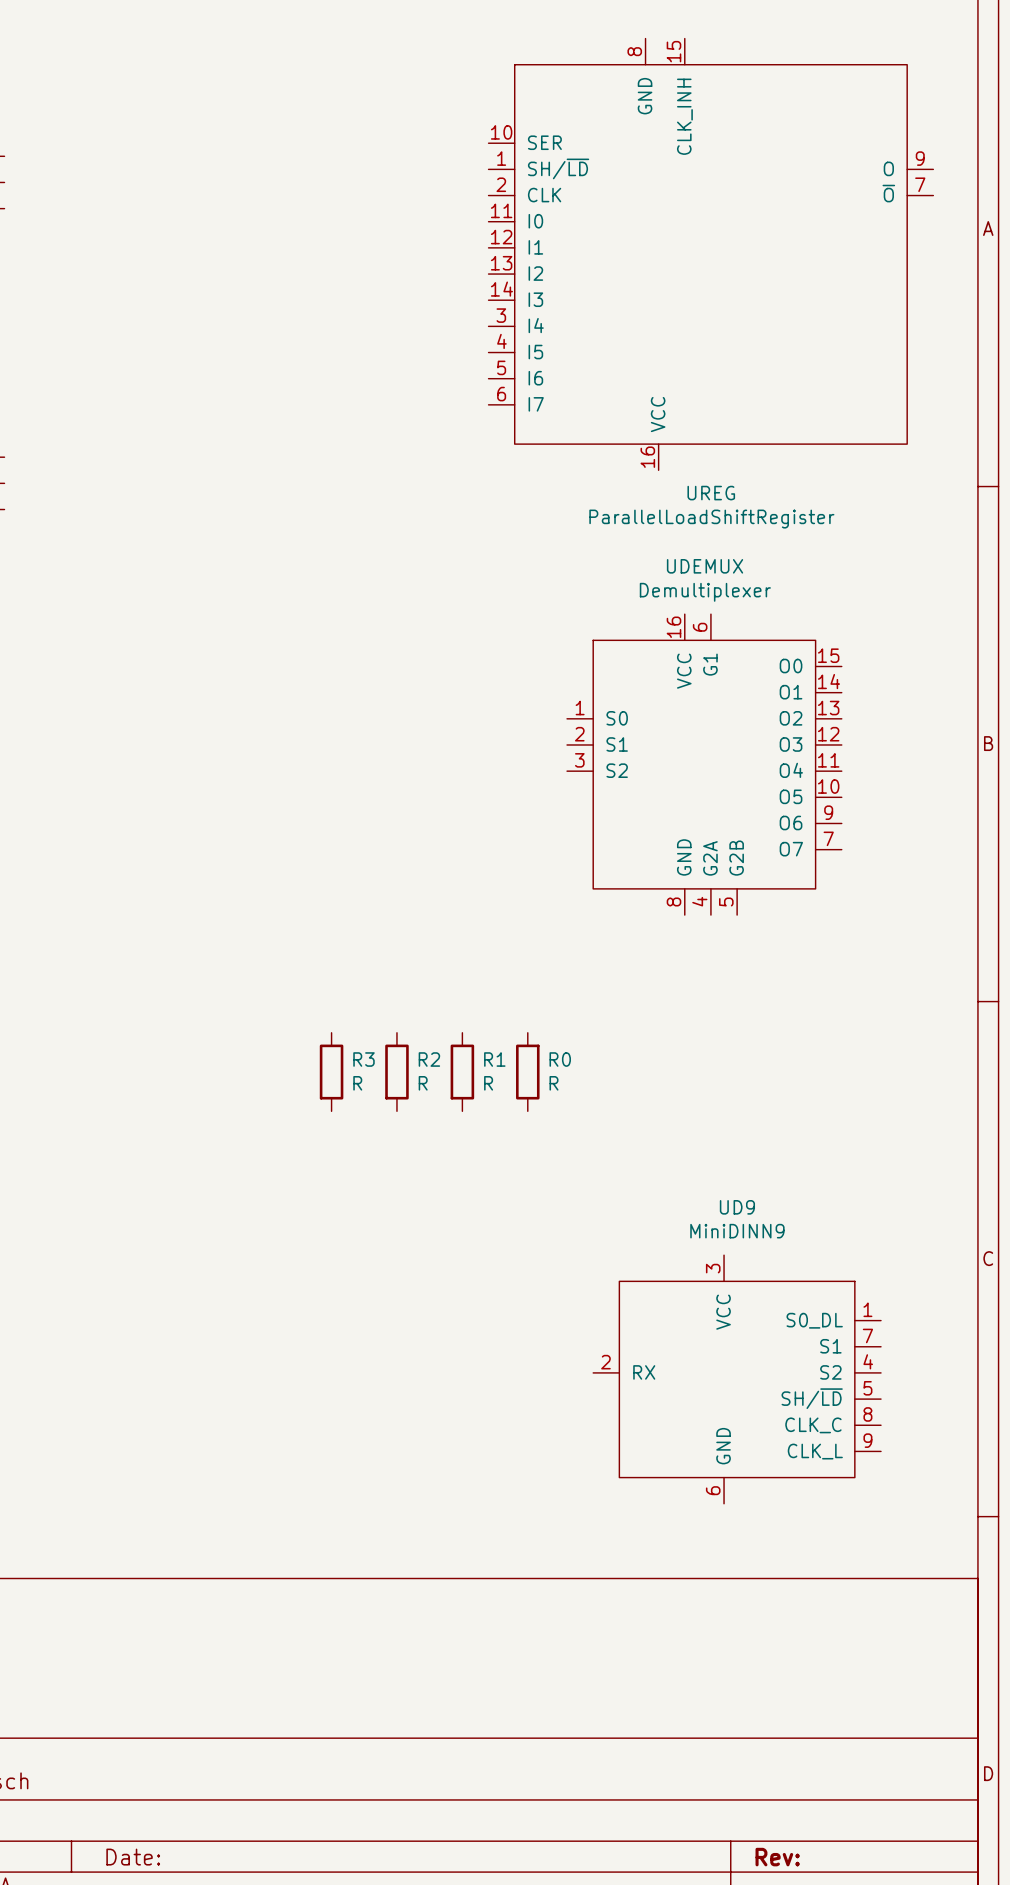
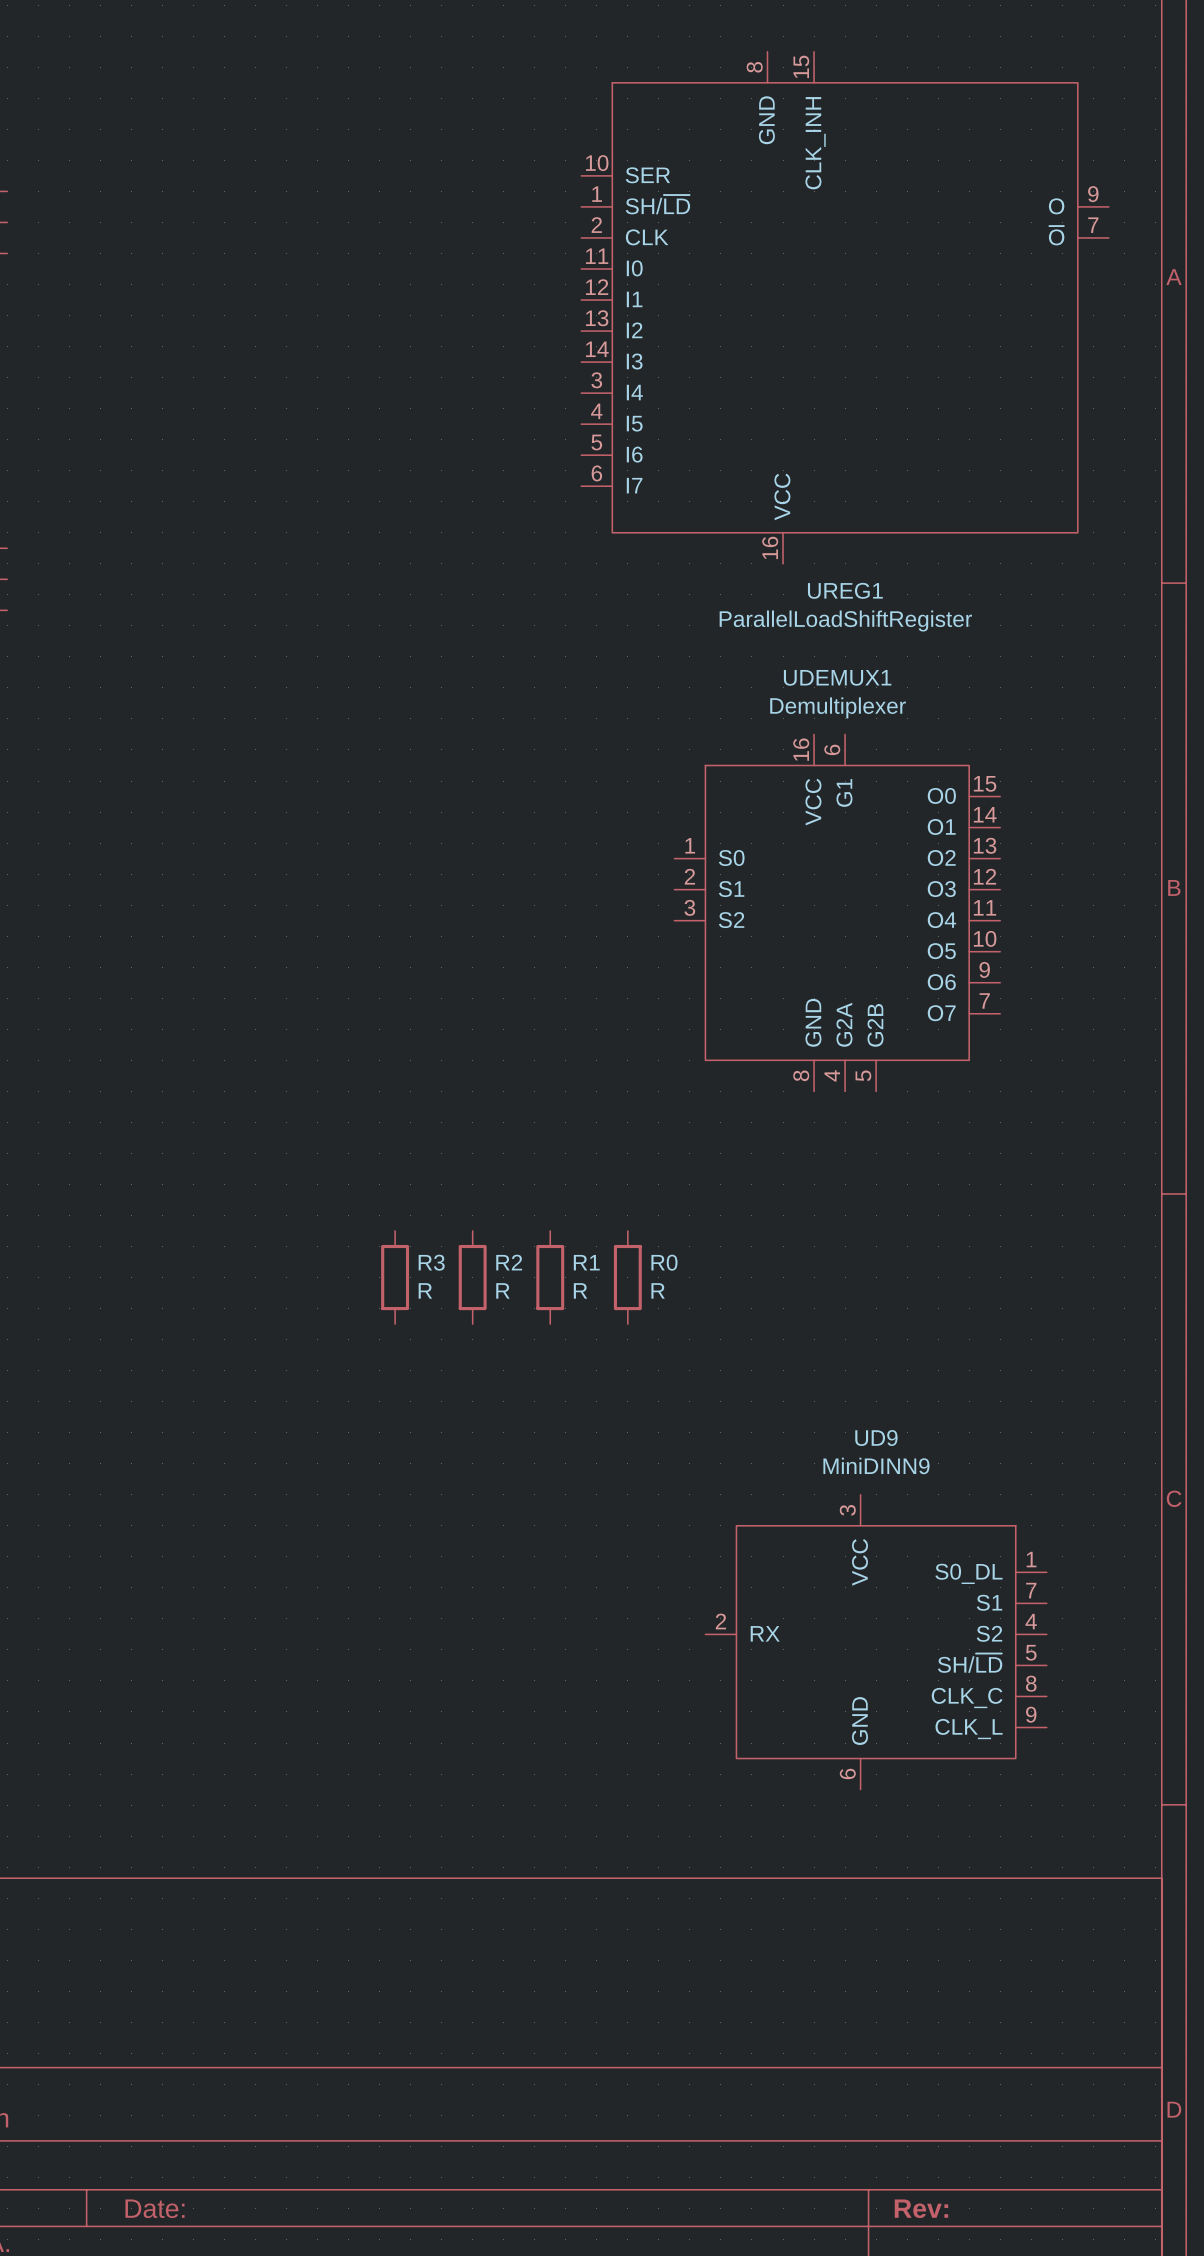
UREG name: UREG (711, 493) -> UREG1 (845, 590)
UDEMUX name: UDEMUX (705, 566) -> UDEMUX1 (837, 677)

